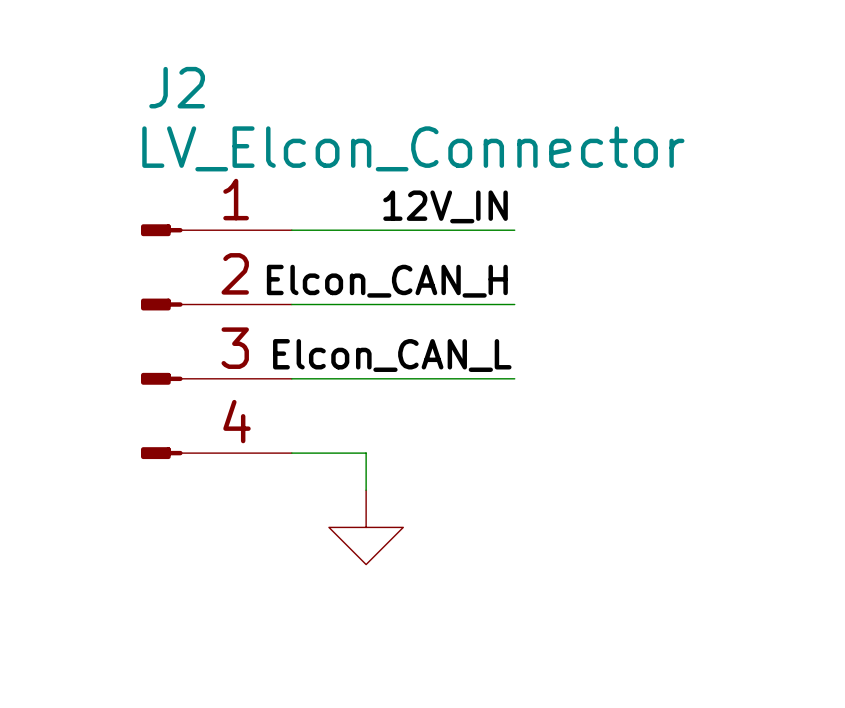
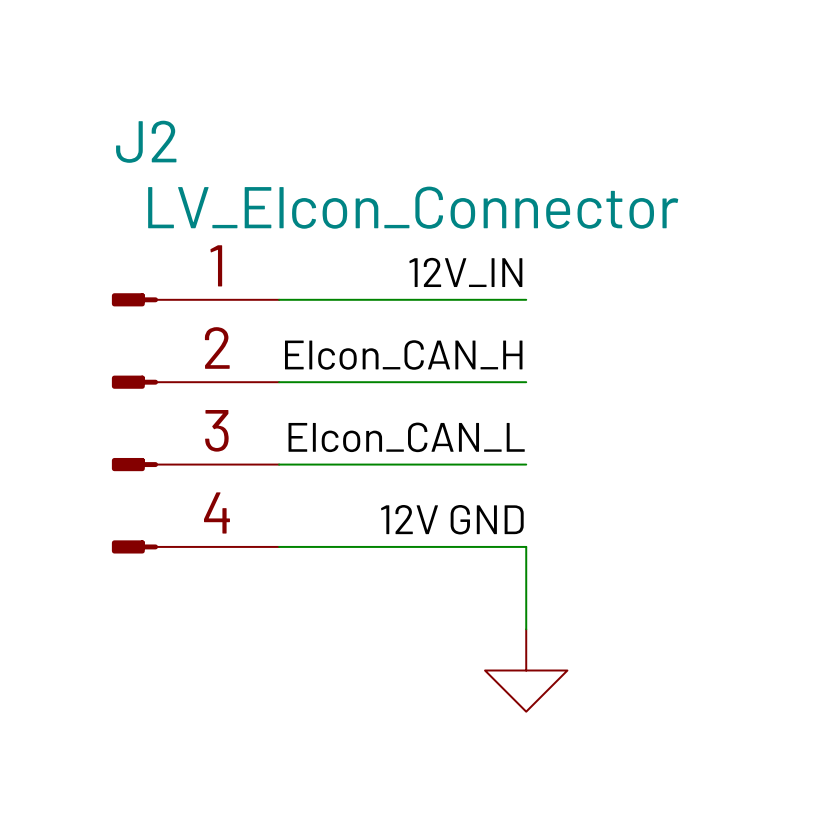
label: none -> 12V GND (452, 519)
wire: (366, 453) (366, 490) -> (361, 546) (526, 546) (526, 629)
power symbol position: (366, 527) -> (526, 670)

